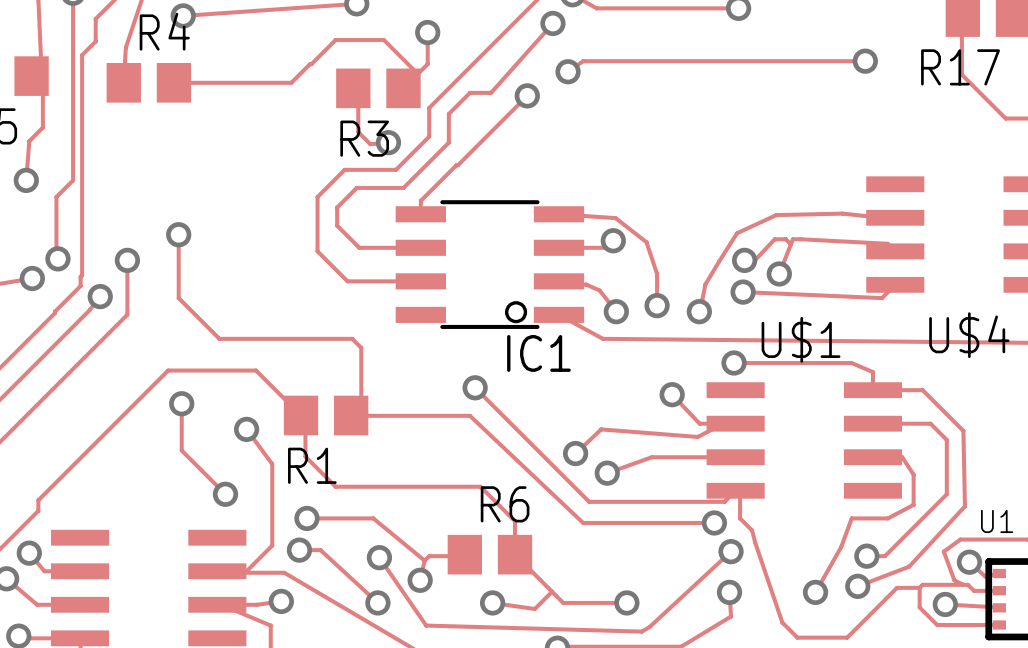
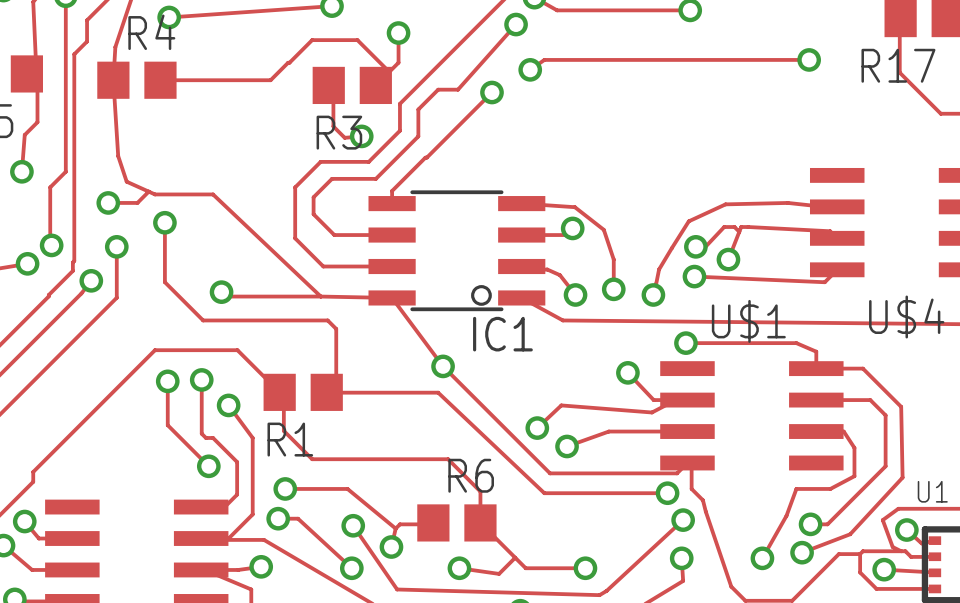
track: none -> (113, 80) (118, 156) (126, 181) (155, 194) (213, 194) (320, 296)
track: none -> (148, 191) (137, 202) (108, 202)
via: none -> (108, 202)
track: none -> (221, 292) (225, 296) (320, 296)
via: none -> (221, 292)
track: none -> (320, 296) (392, 297) (443, 366)
track: none -> (201, 379) (201, 433) (205, 437) (213, 437) (237, 462) (237, 494) (222, 508) (202, 508) (201, 507)
via: none -> (201, 379)

